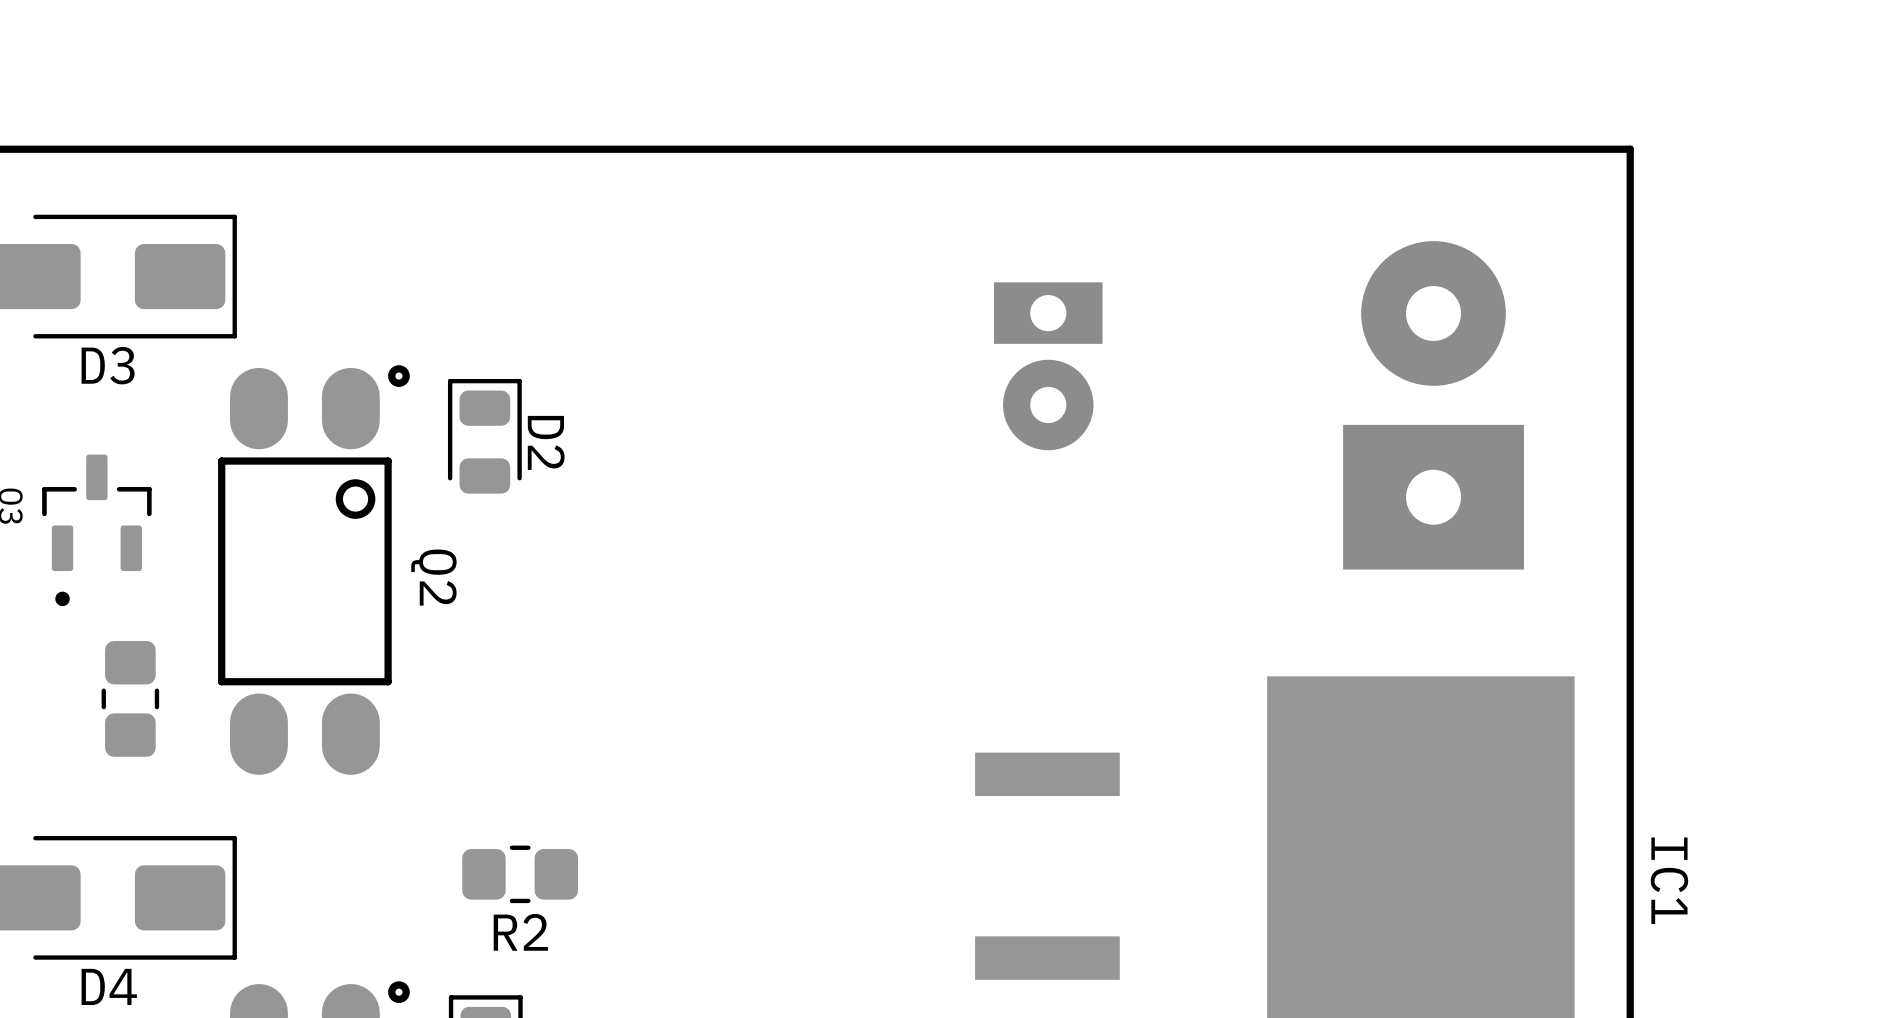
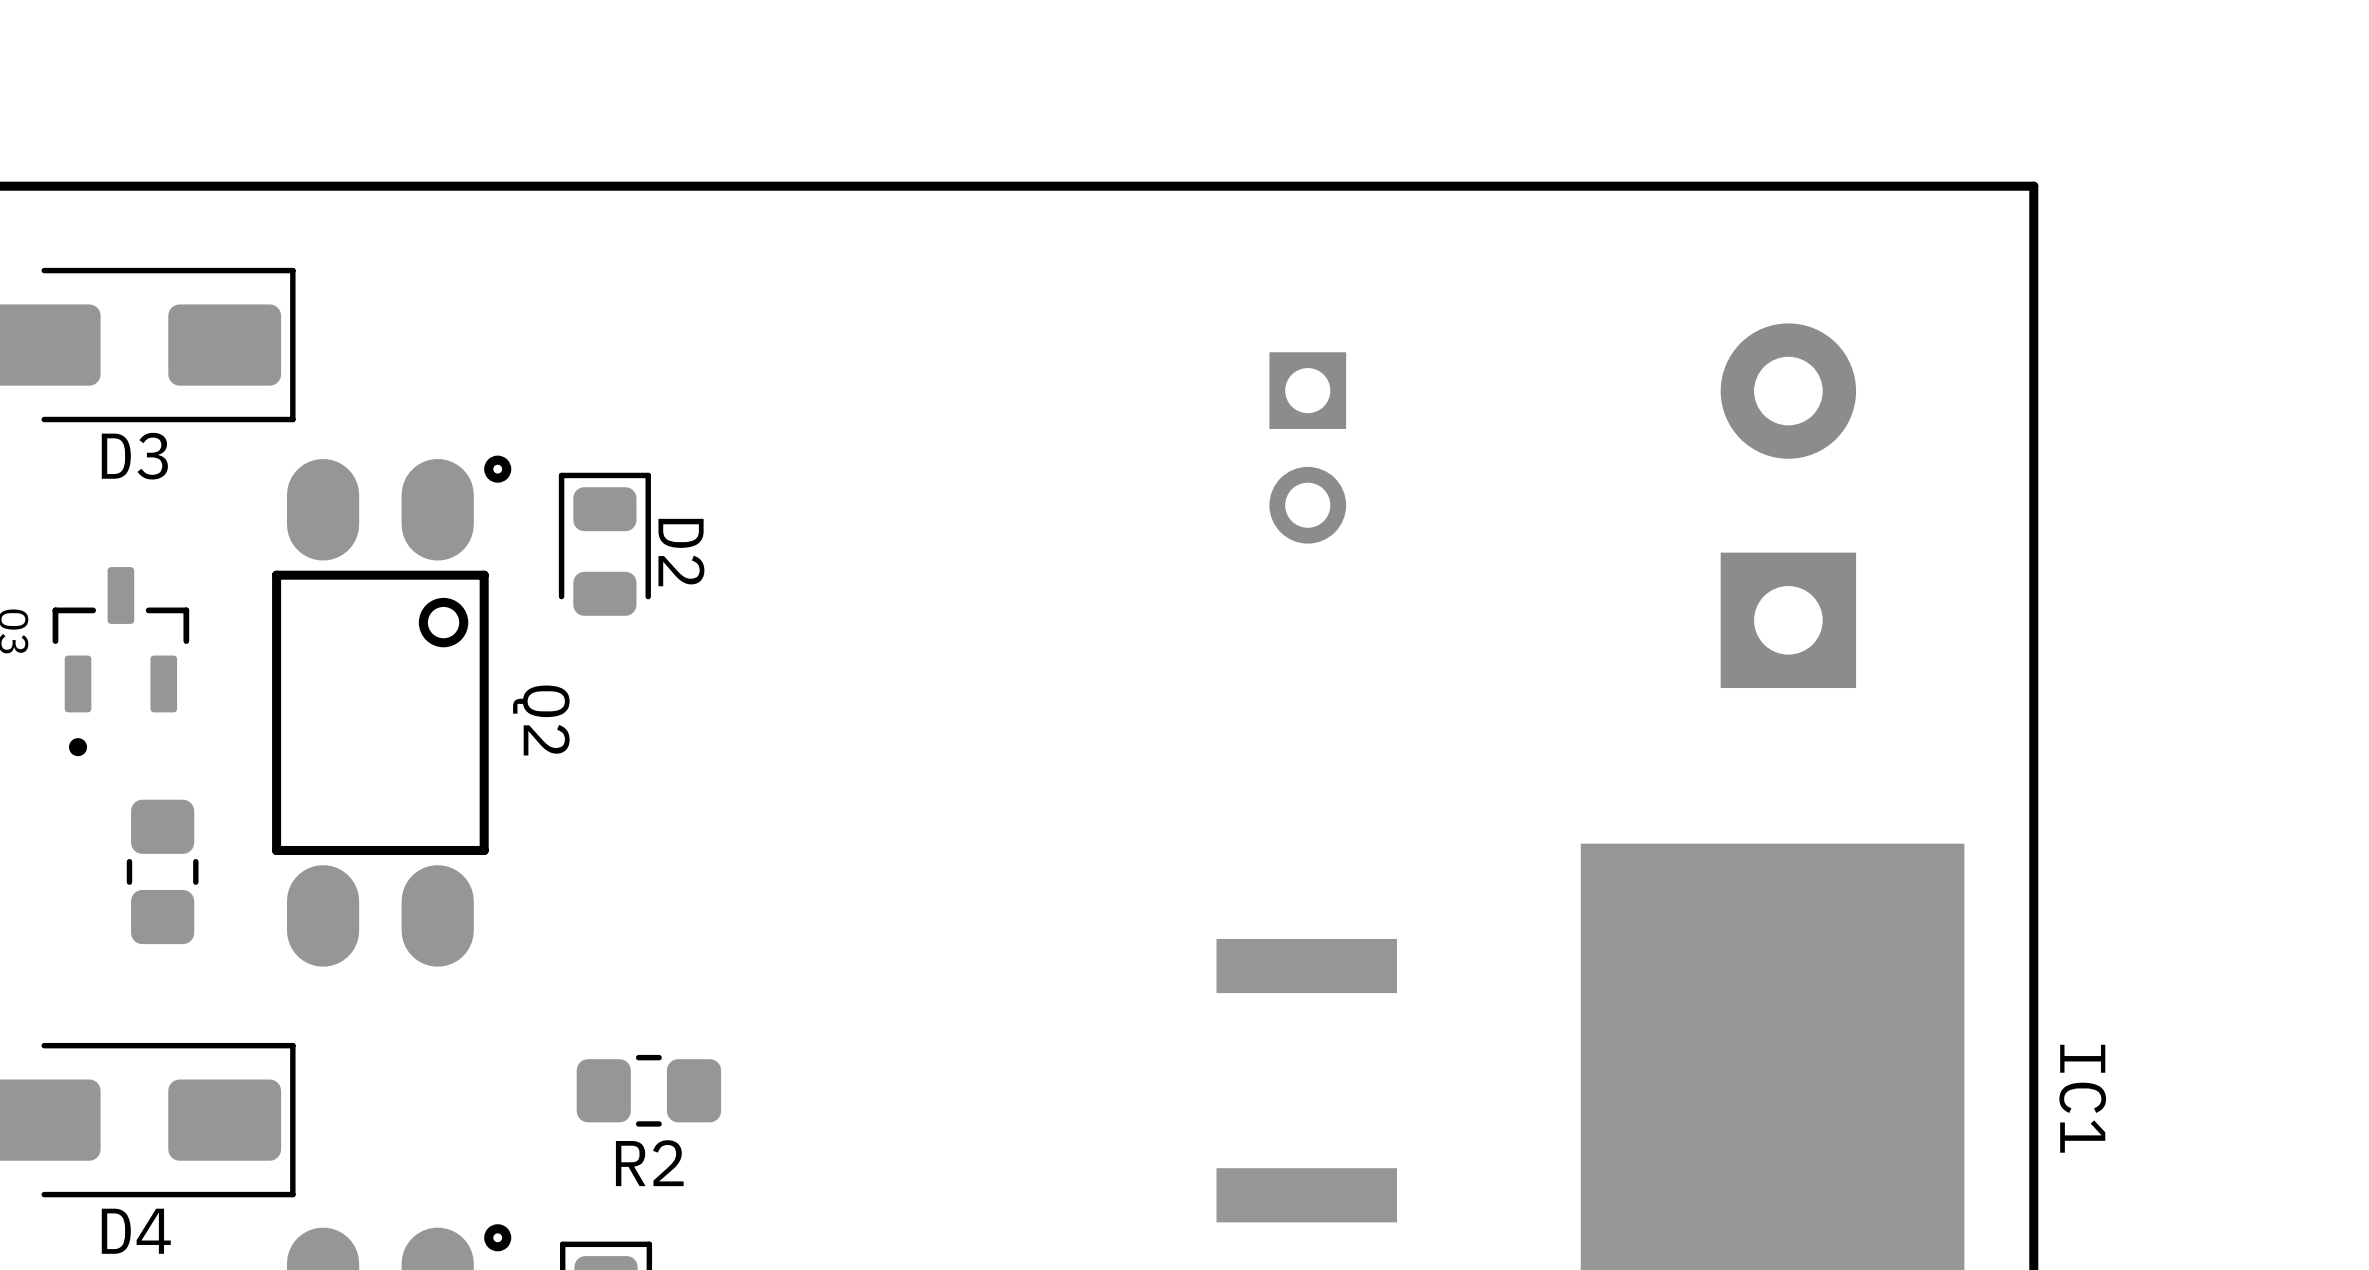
part footprint: [1343, 241, 1524, 570] -> [1720, 323, 1857, 689]
part footprint: [994, 282, 1103, 451] -> [1269, 352, 1347, 544]

